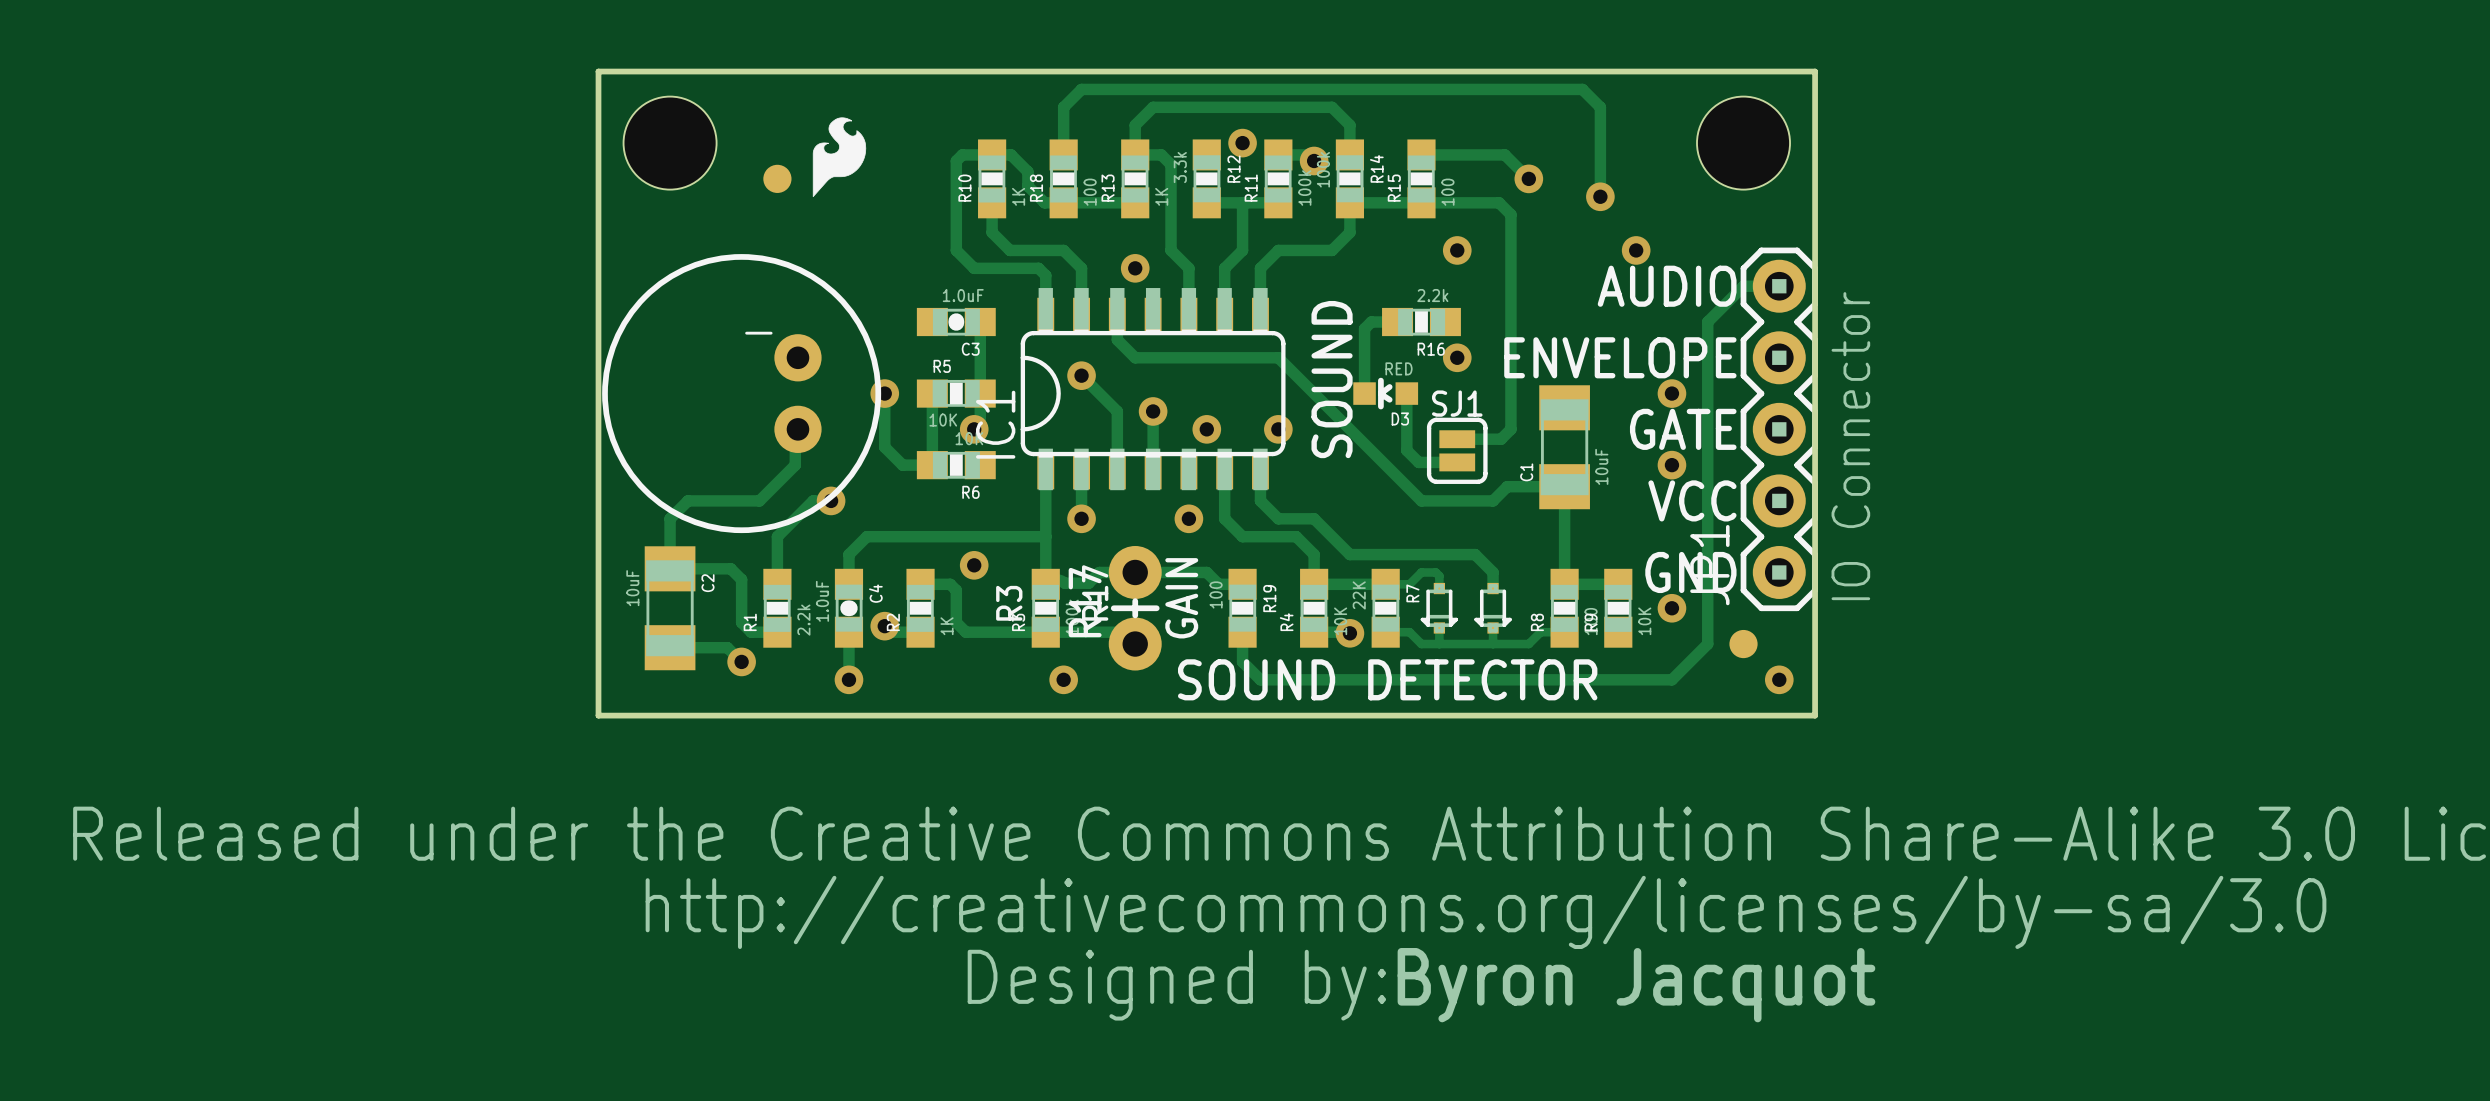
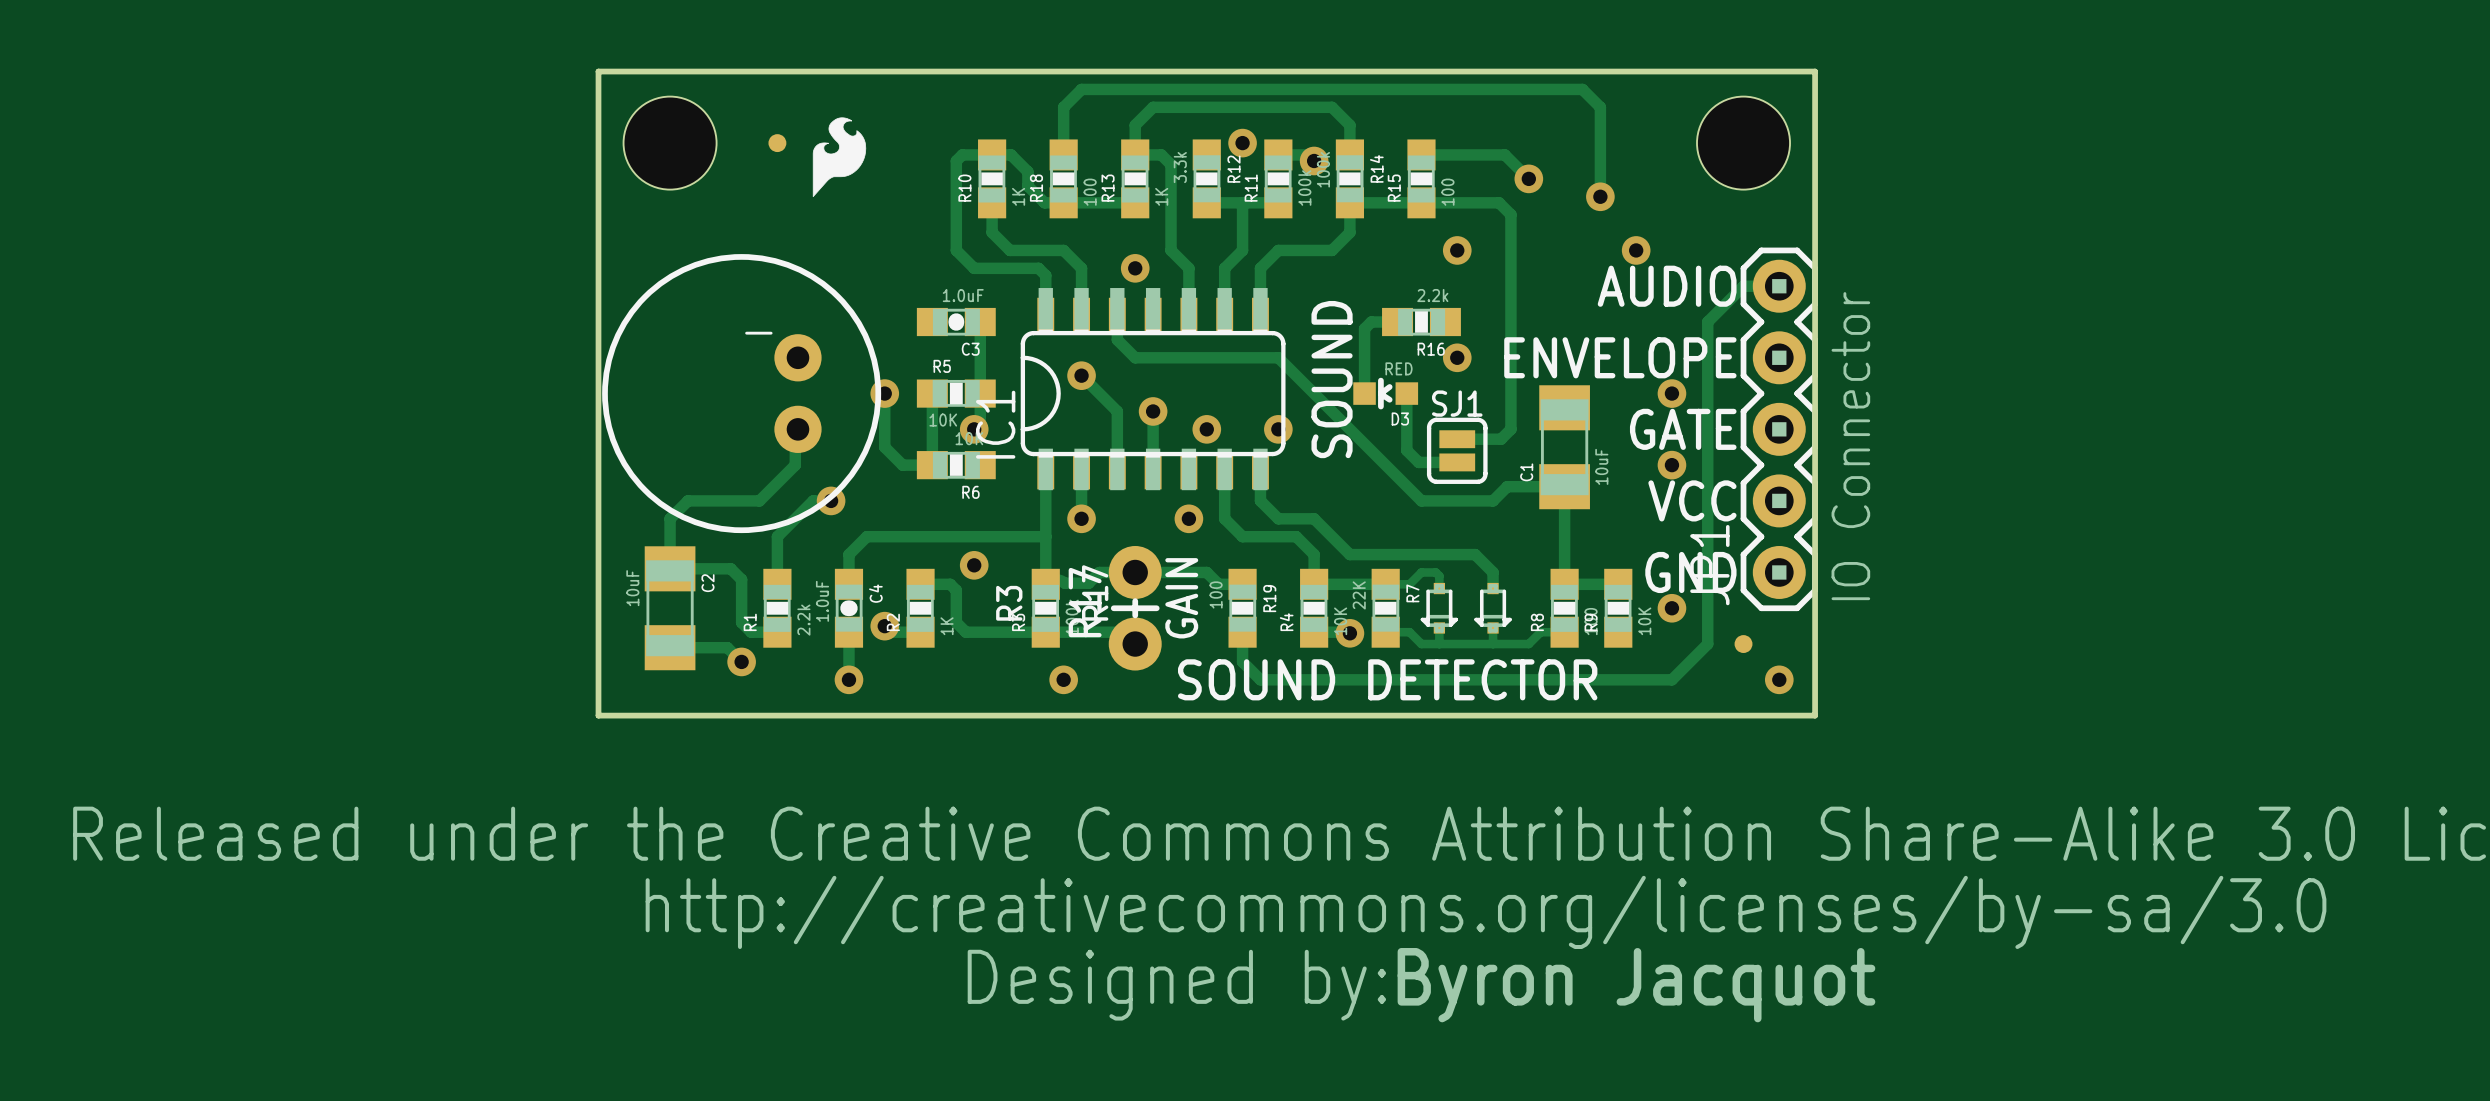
part: none -> (777, 143)
part: (777, 178) -> none
part footprint: [1729, 629, 1758, 659] -> [1734, 635, 1753, 653]

